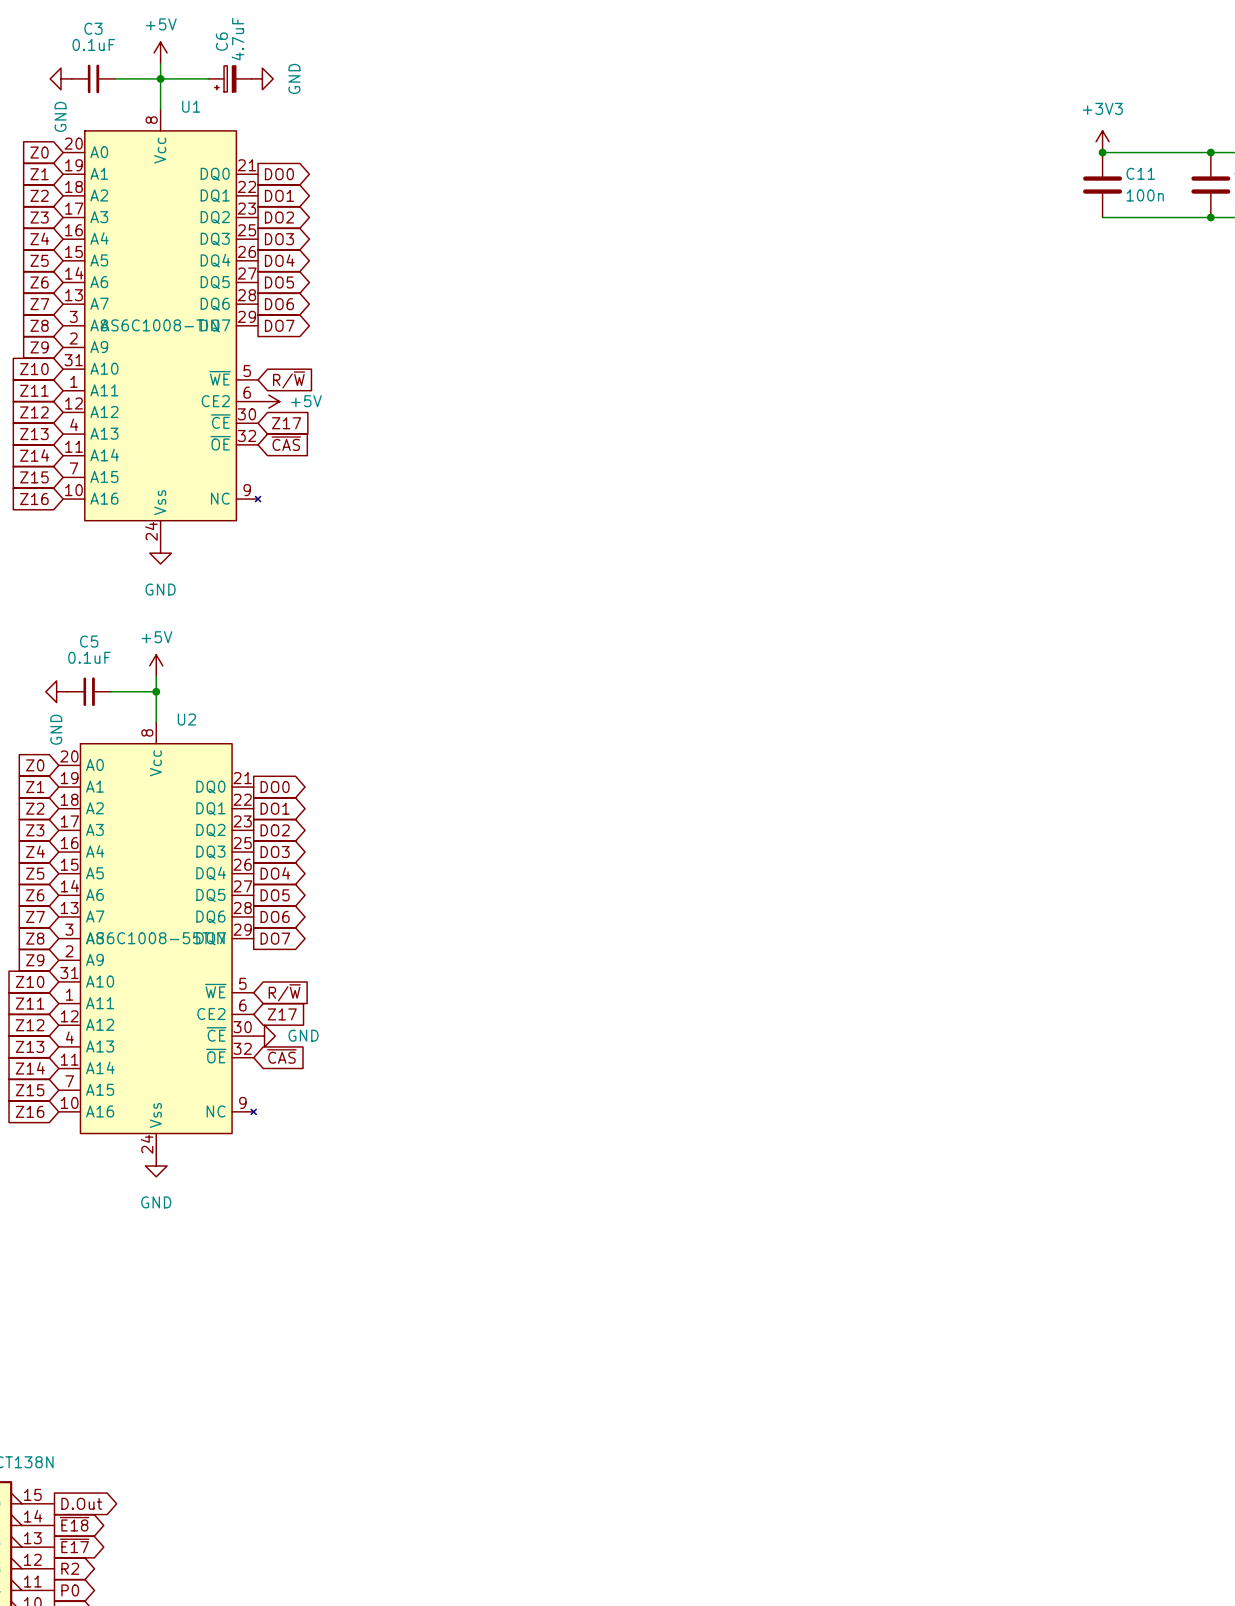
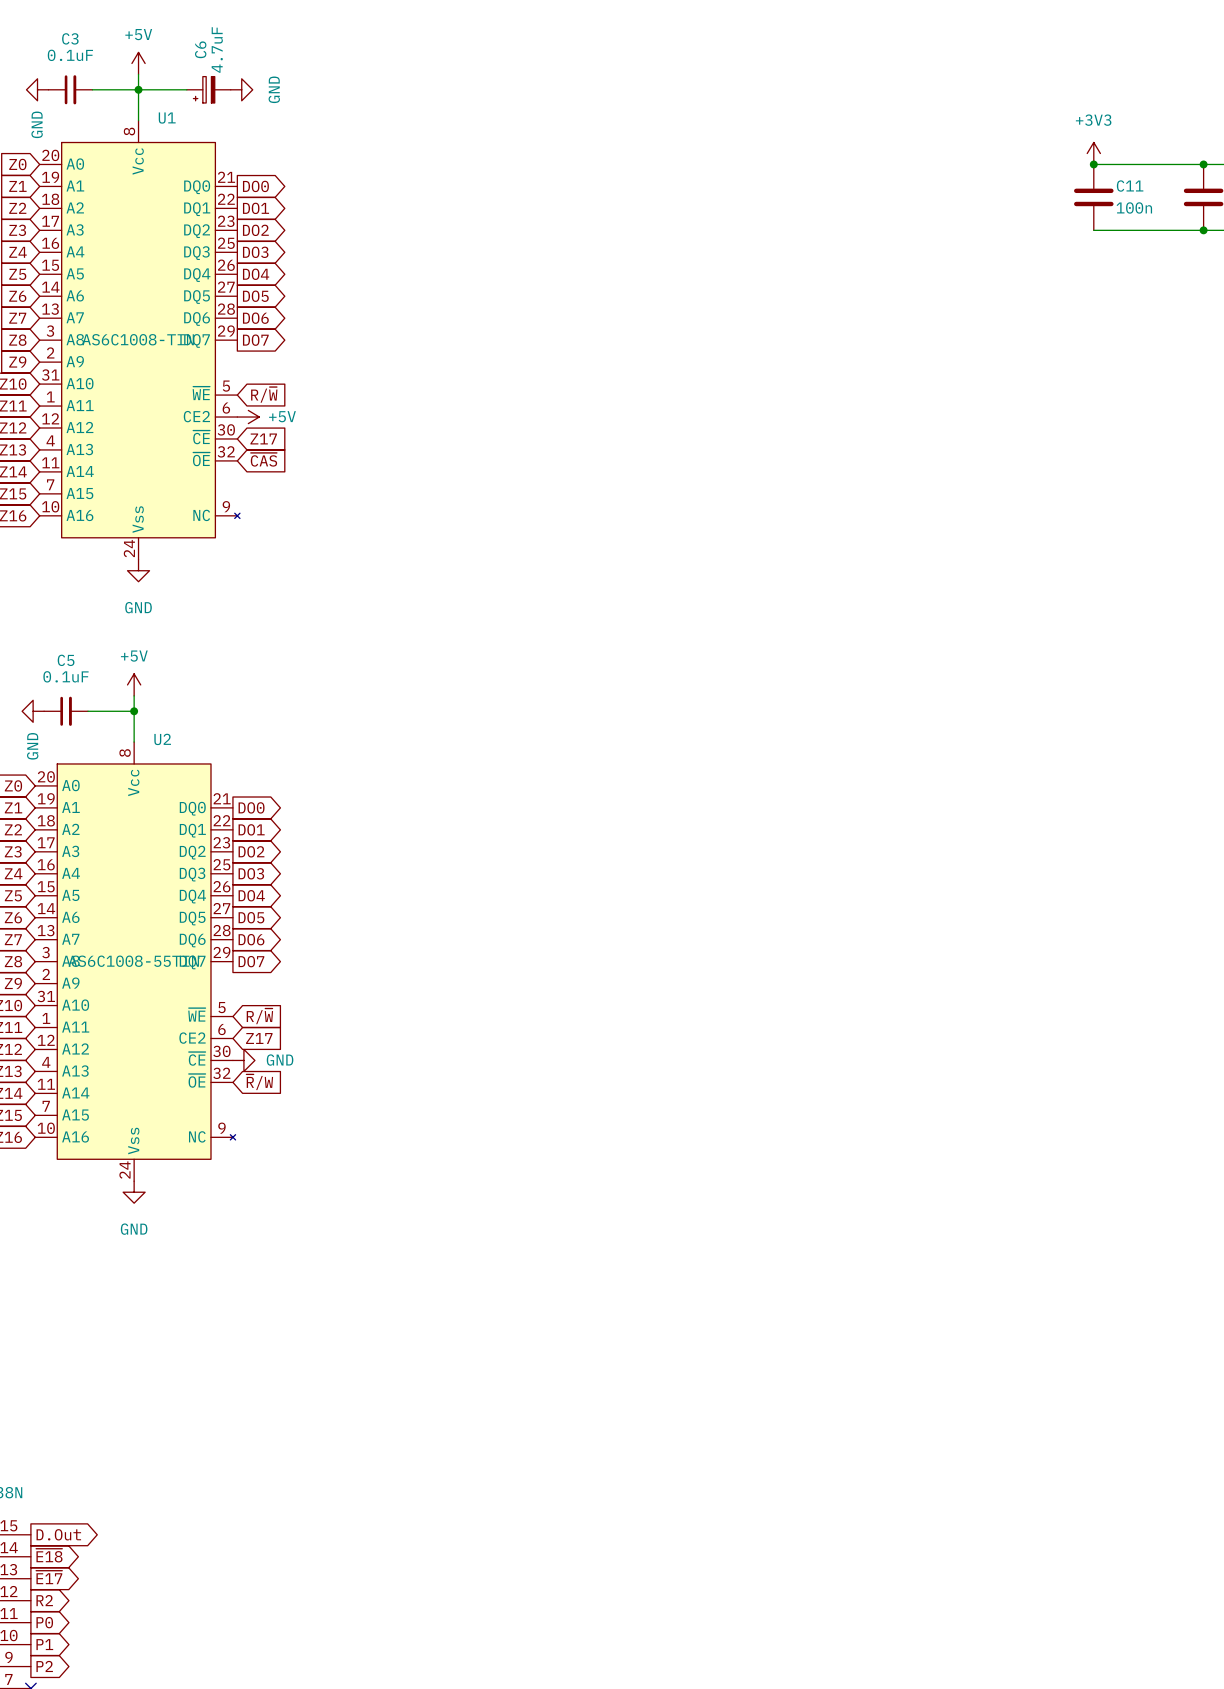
global label: ~{CAS} (281, 1056) -> ~{R}/W (259, 1082)

